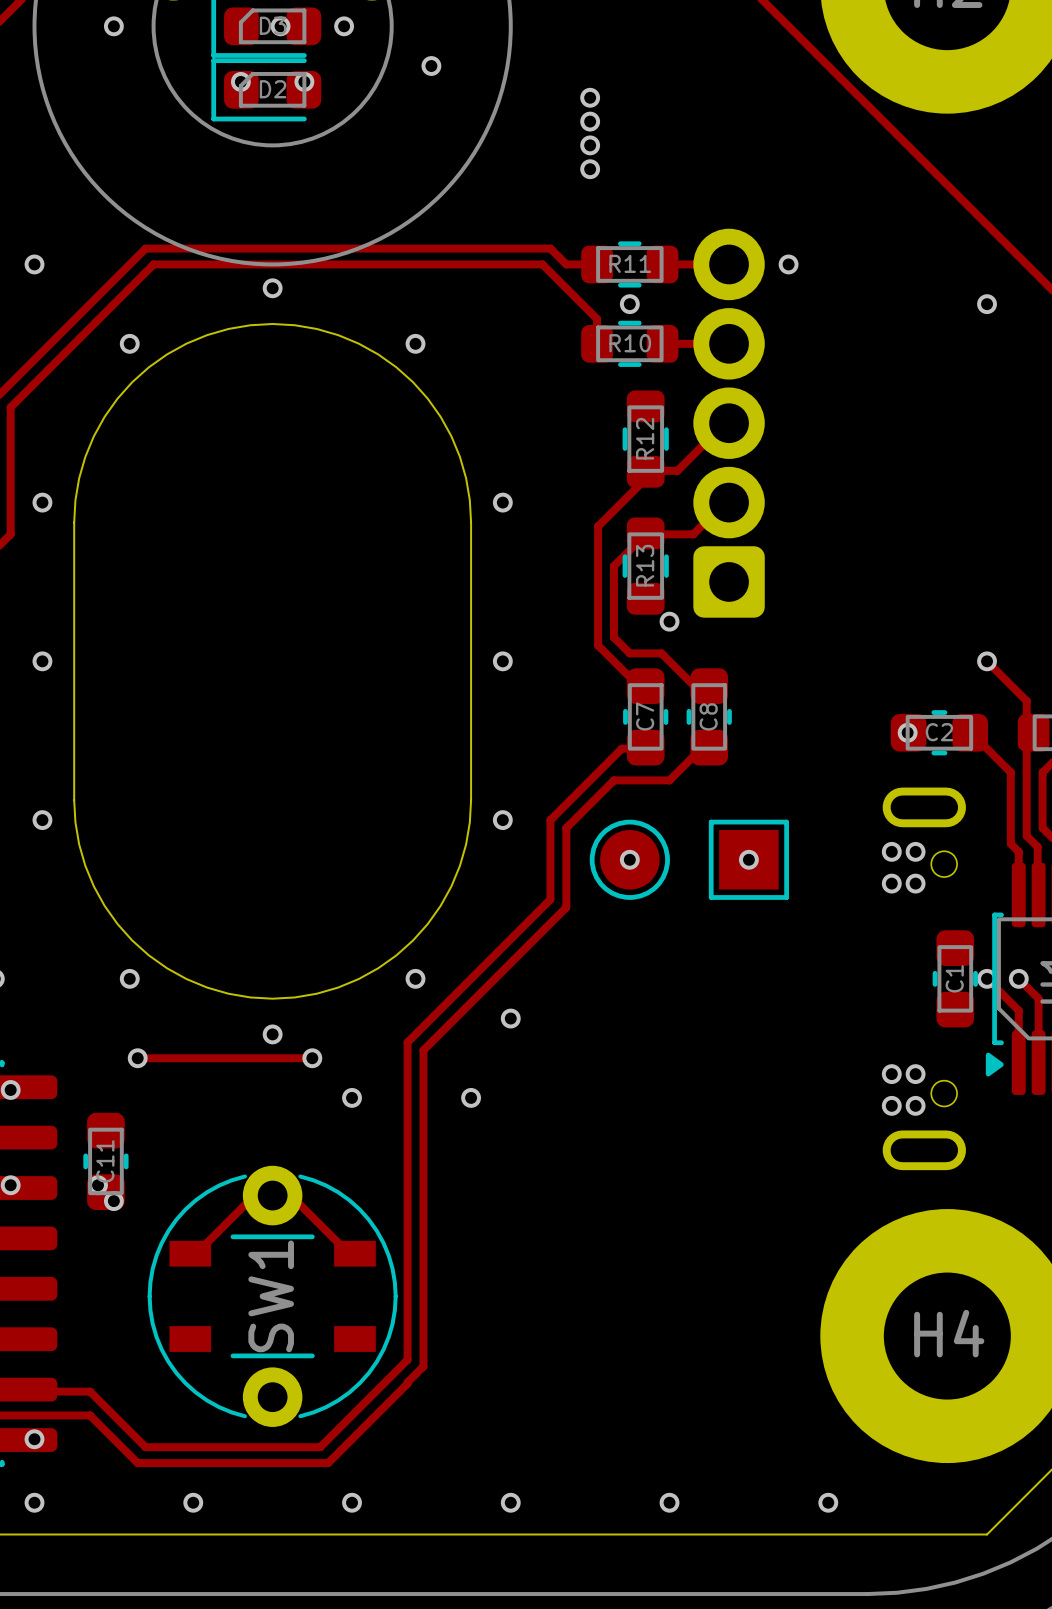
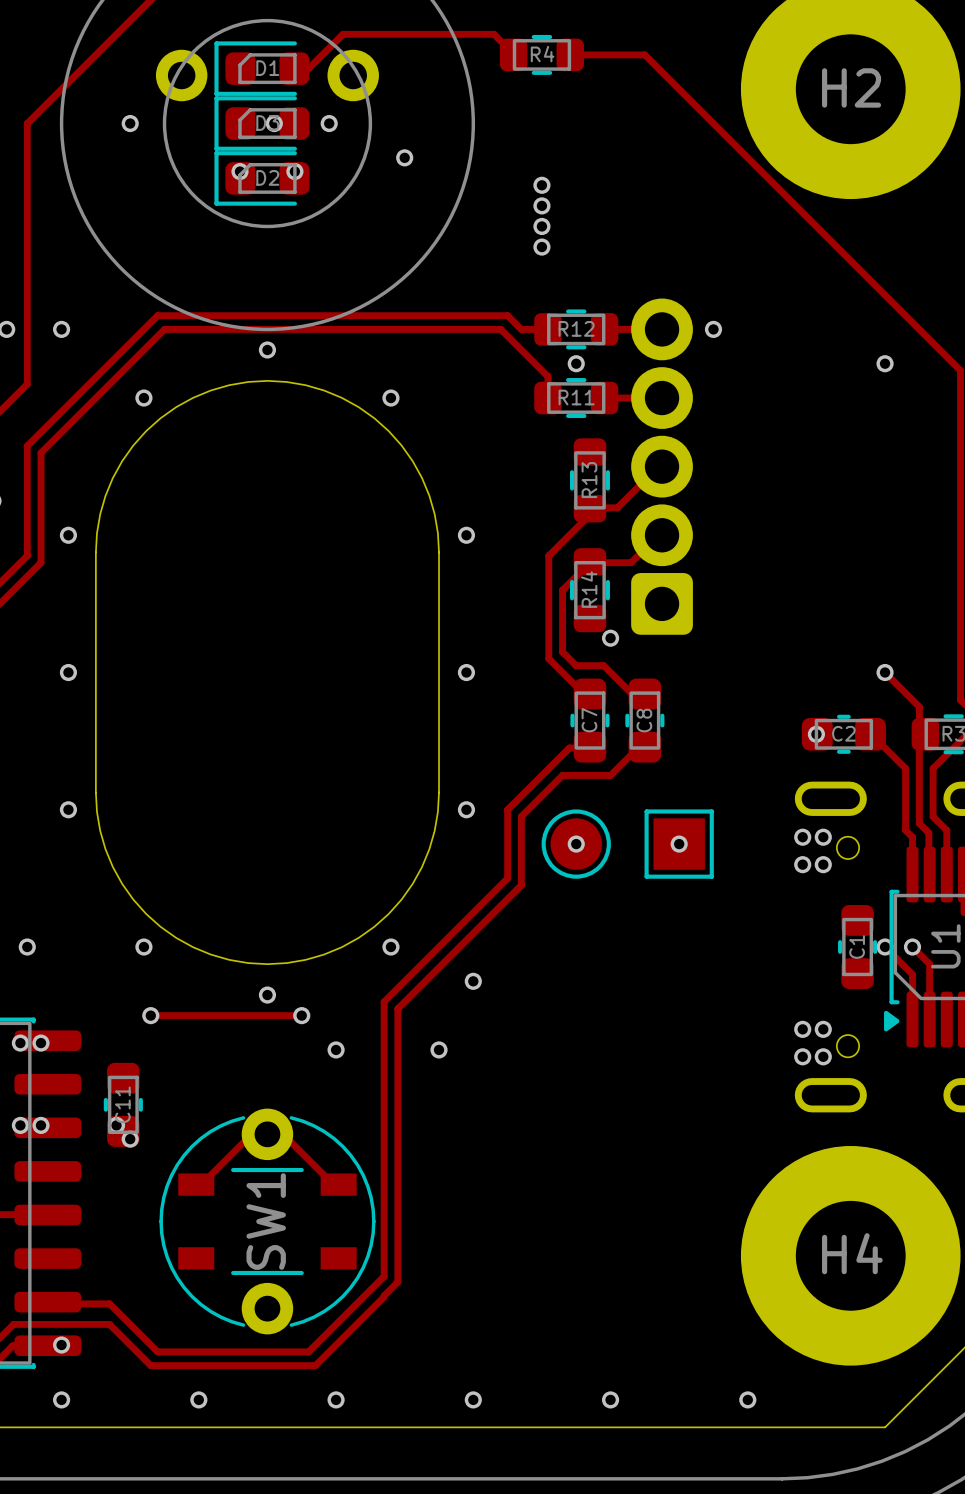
R11 name: R11 (630, 263) -> R12 (576, 328)
R10 name: R10 (630, 343) -> R11 (576, 397)
R12 name: R12 (645, 438) -> R13 (589, 480)
R13 name: R13 (645, 565) -> R14 (589, 589)

